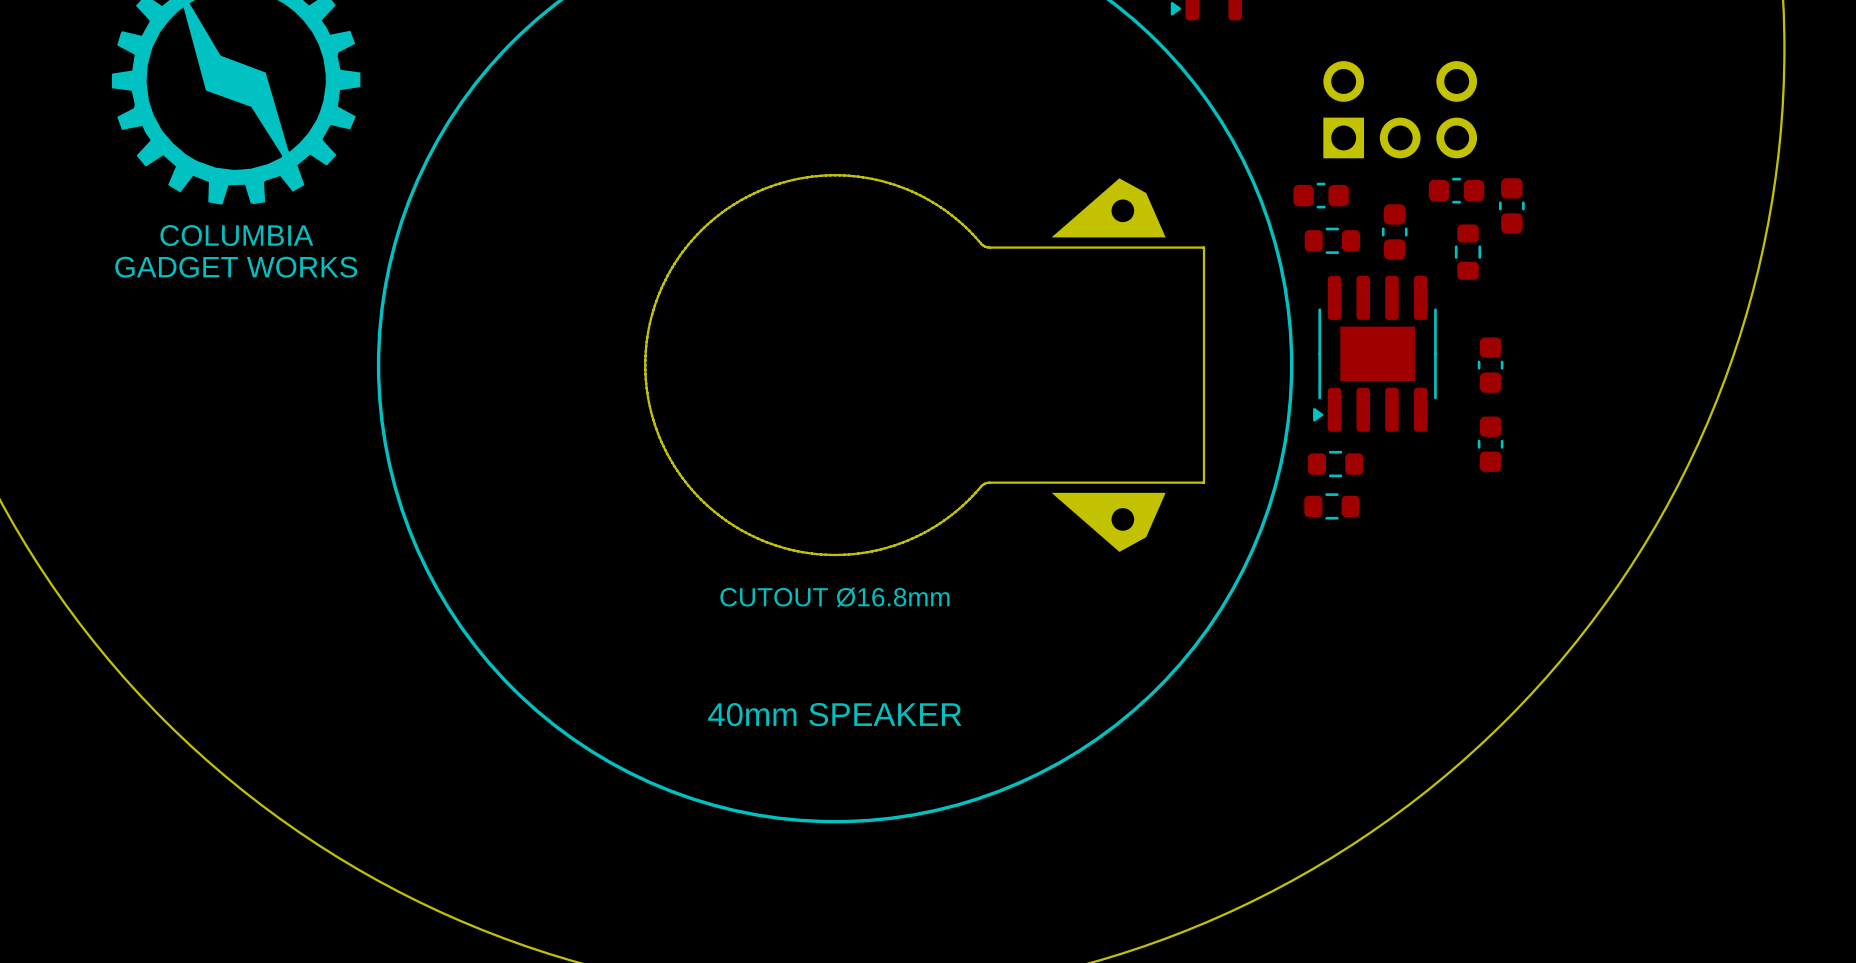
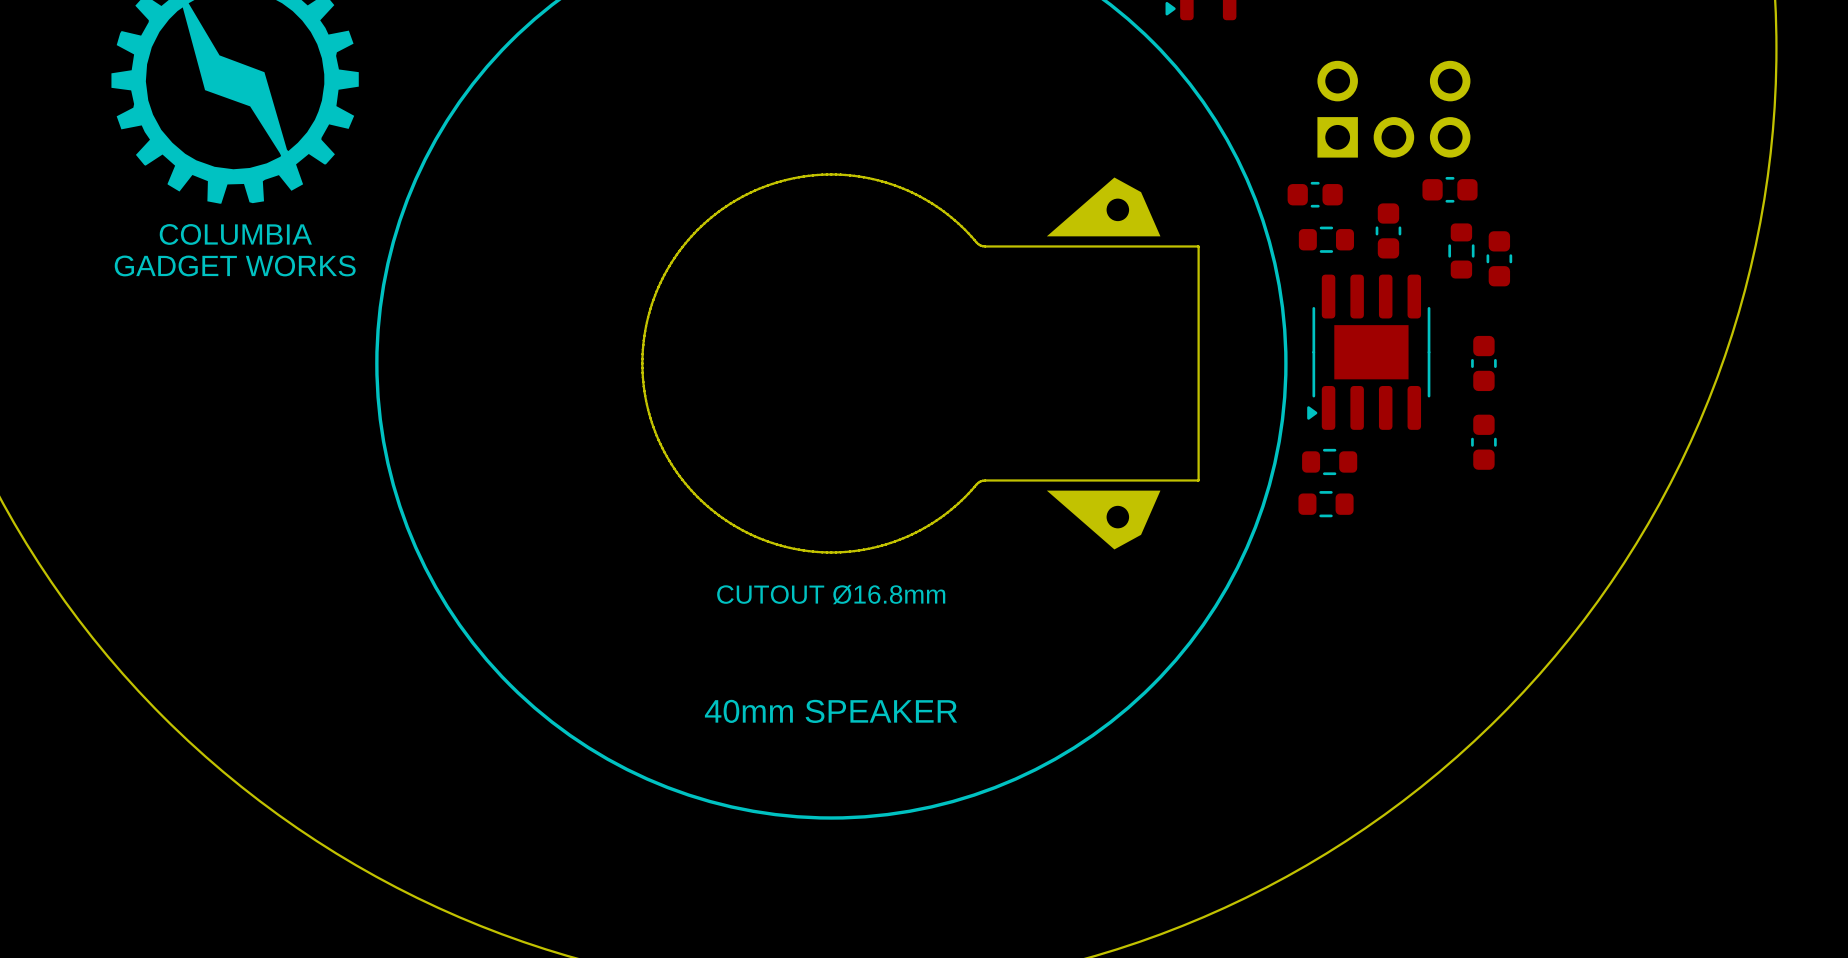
part position: (1511, 205) -> (1499, 258)

